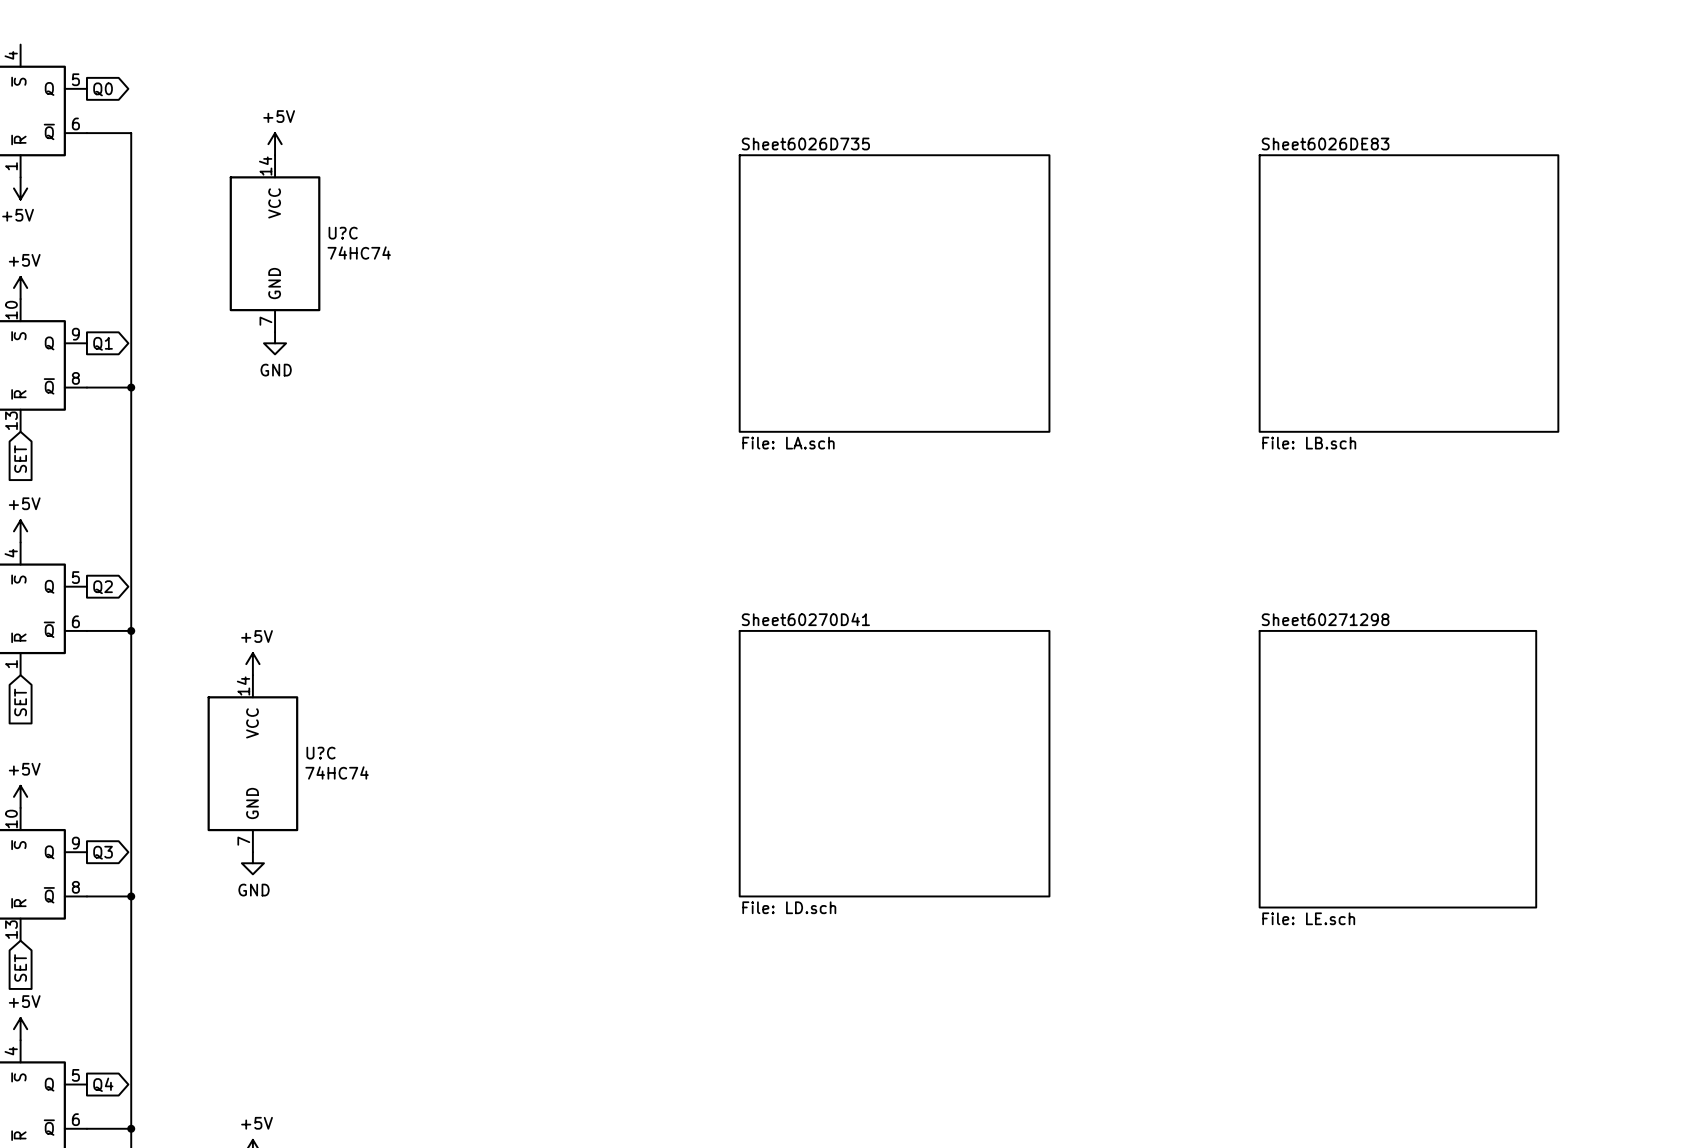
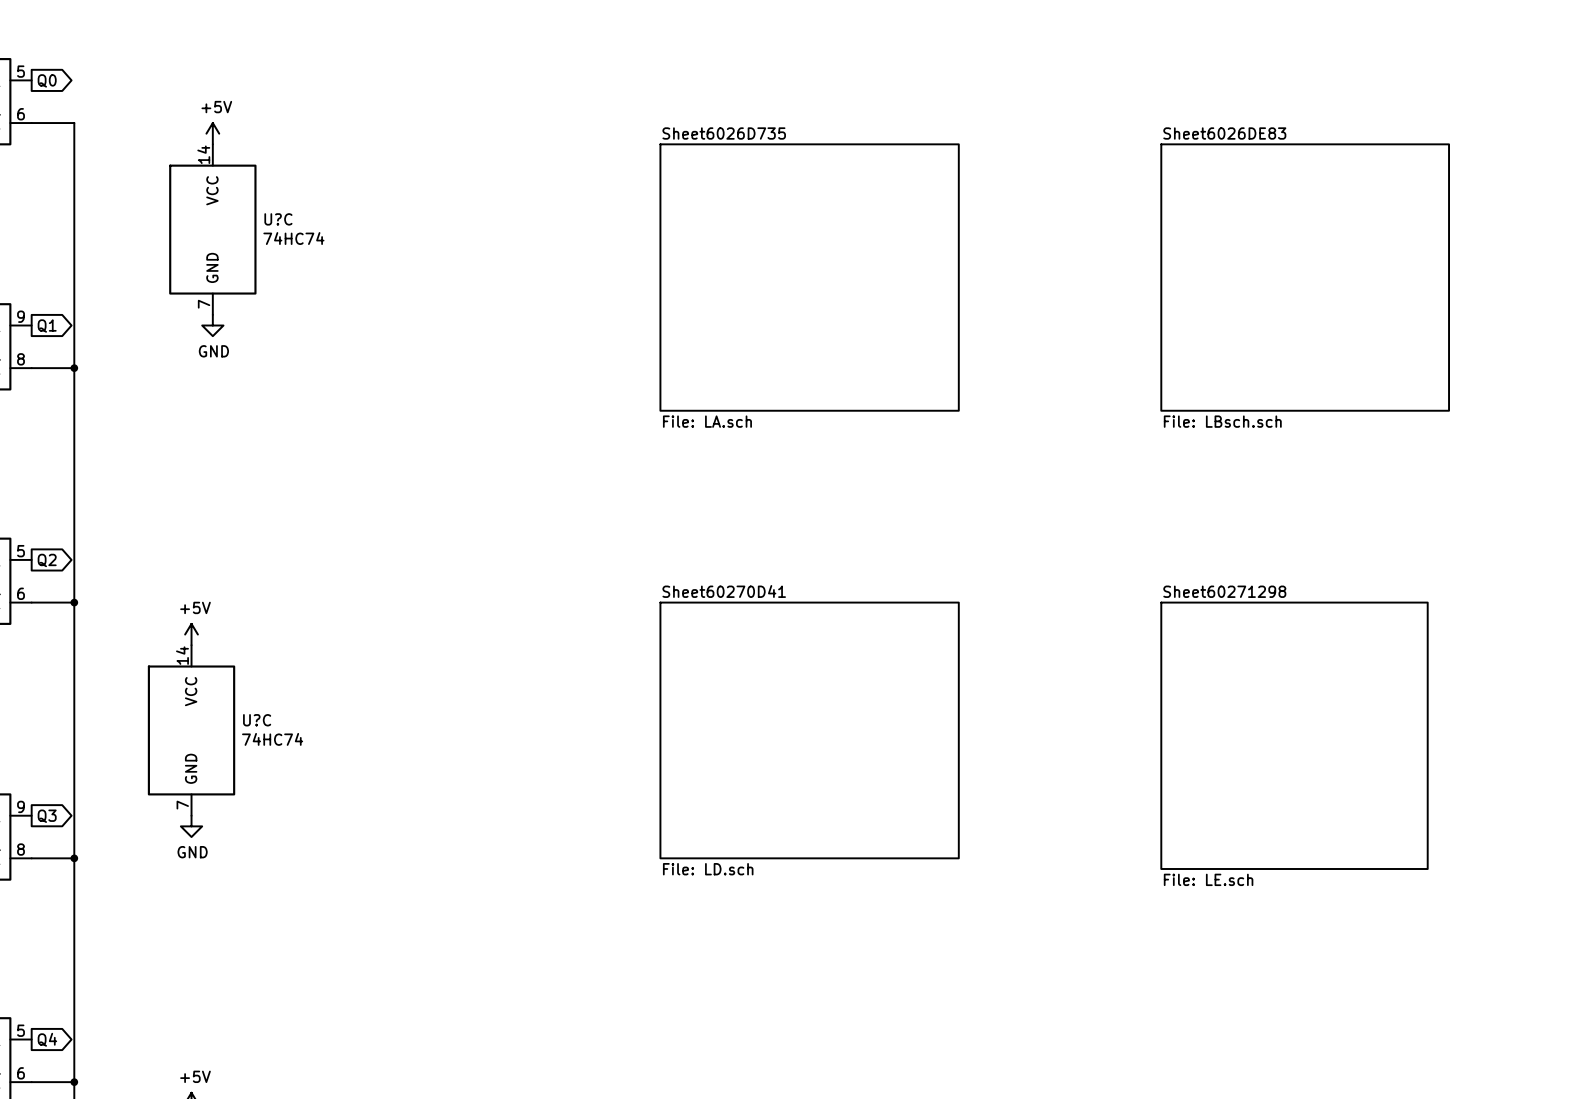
sheet Sheet6026DE83 value: File: LB.sch (1309, 443) -> File: LBsch.sch (1222, 421)

